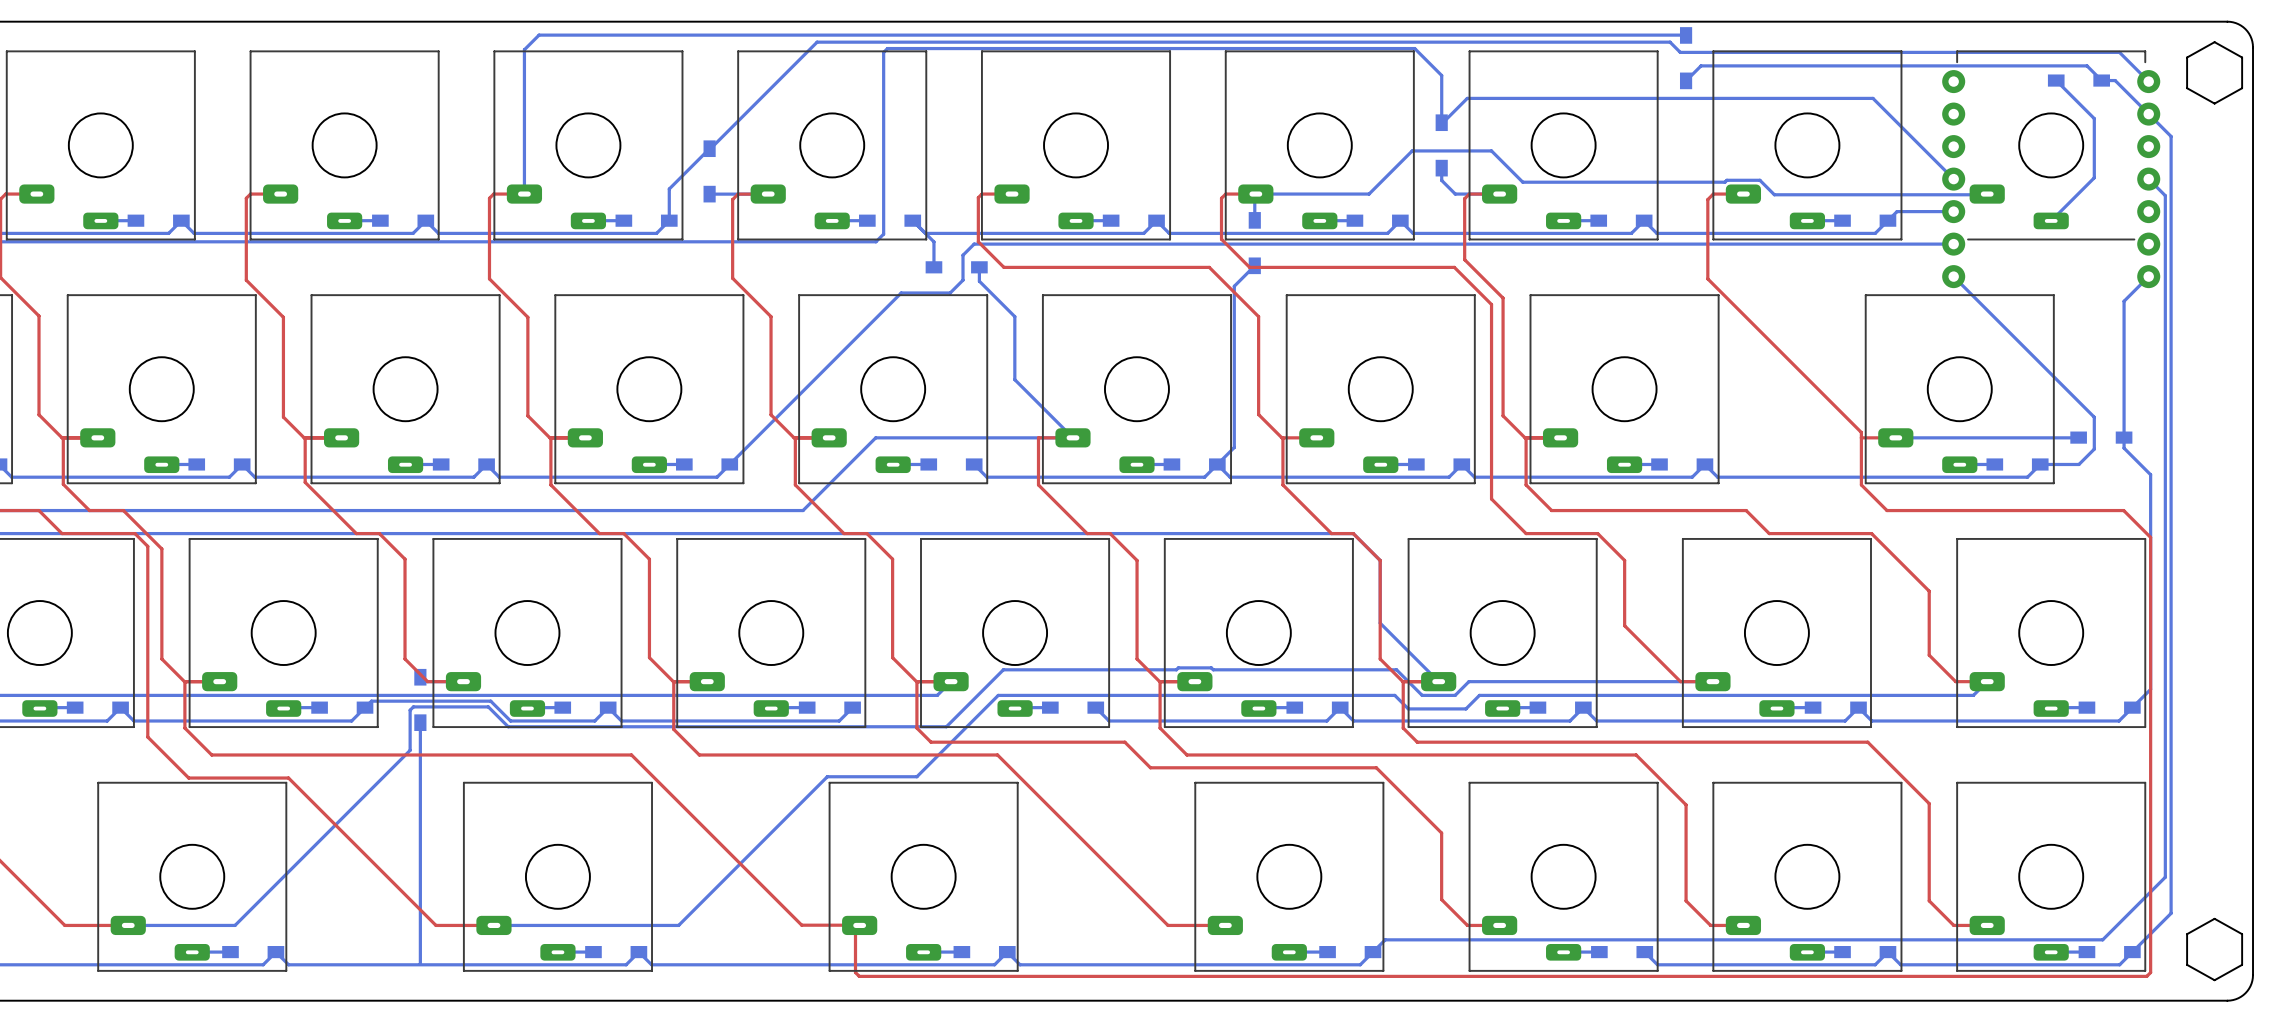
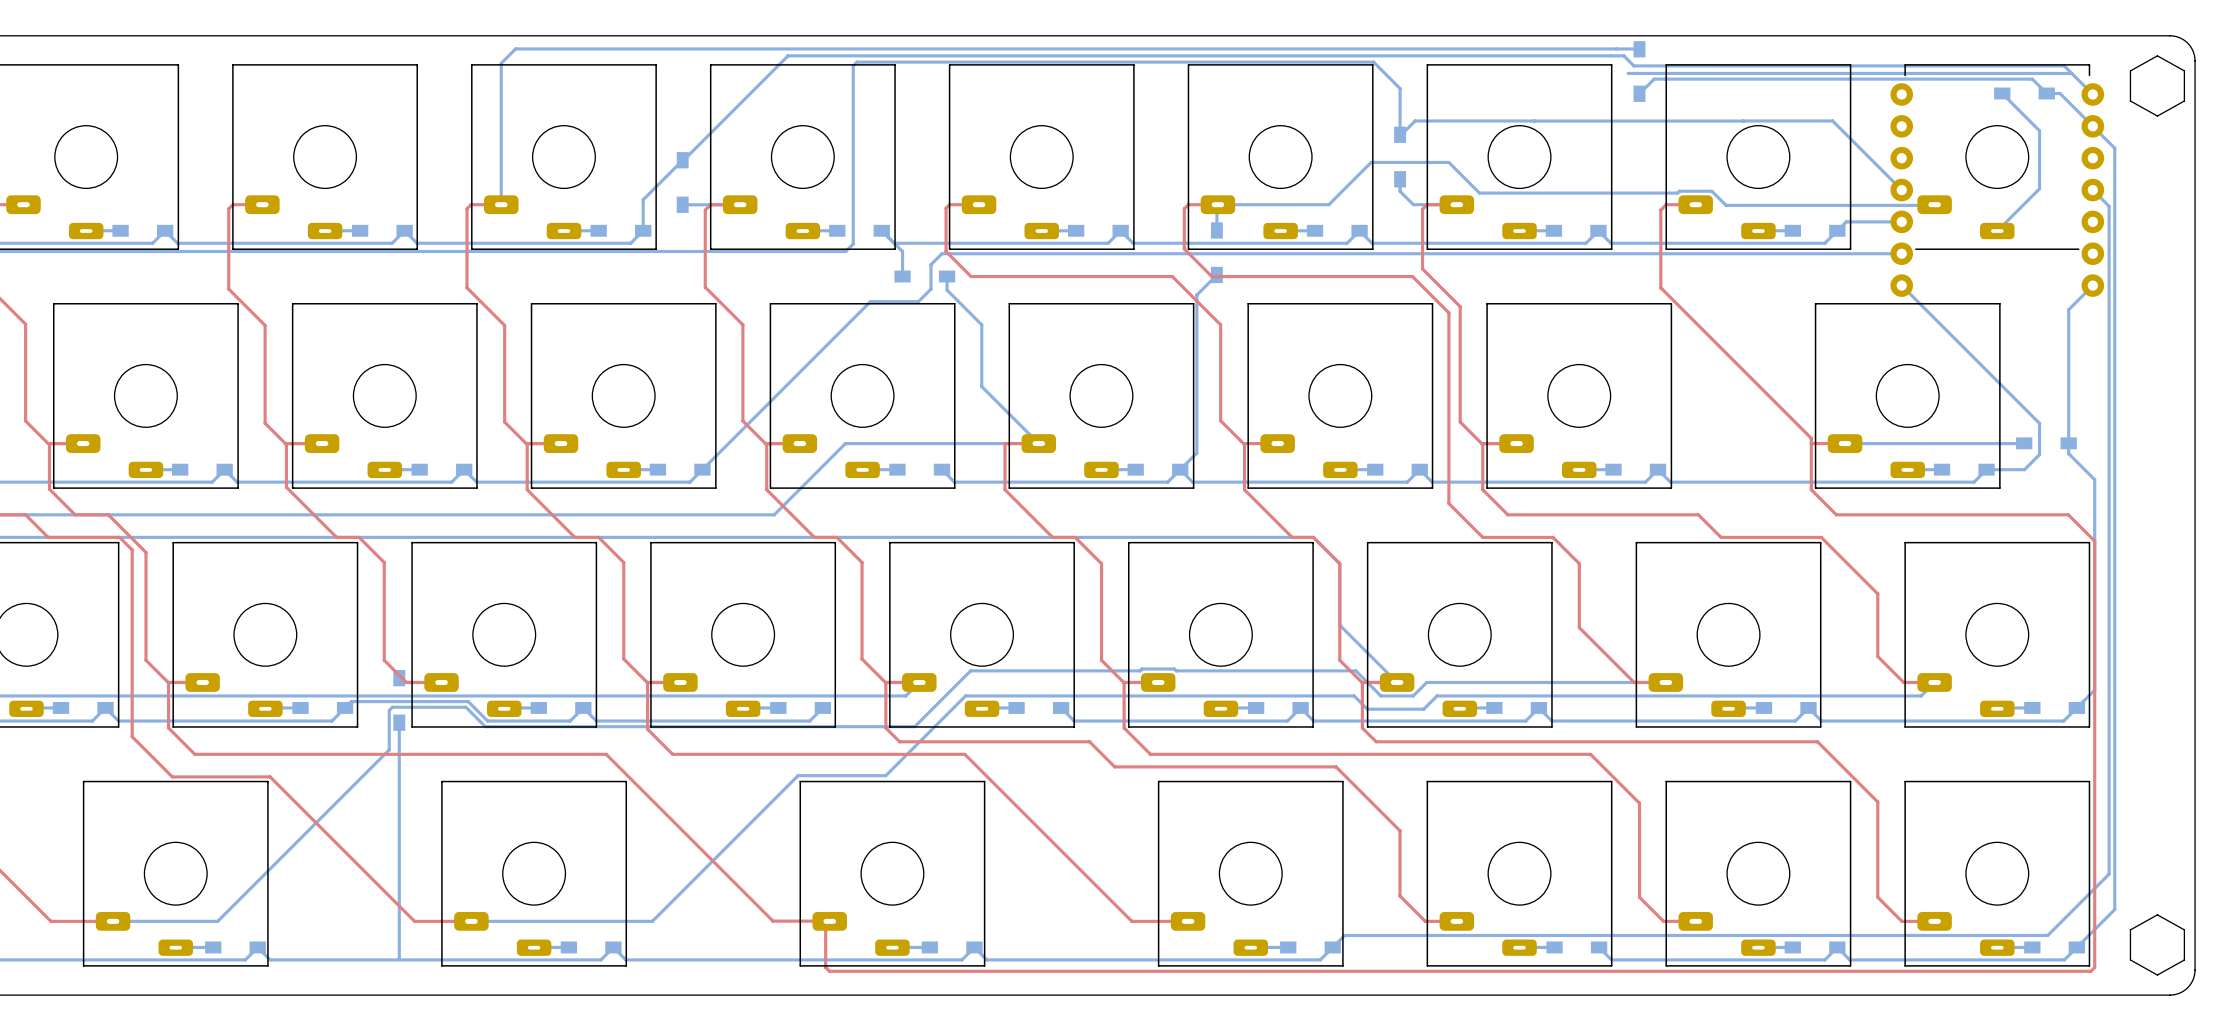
bottom track: none -> (1628, 73) (2071, 73)
bottom track: (1457, 108) (1467, 98) (1872, 98) (1883, 108) -> (1415, 120) (1534, 120)
bottom track: none -> (1534, 121) (1743, 121)
bottom track: none -> (1743, 120) (1832, 120)

